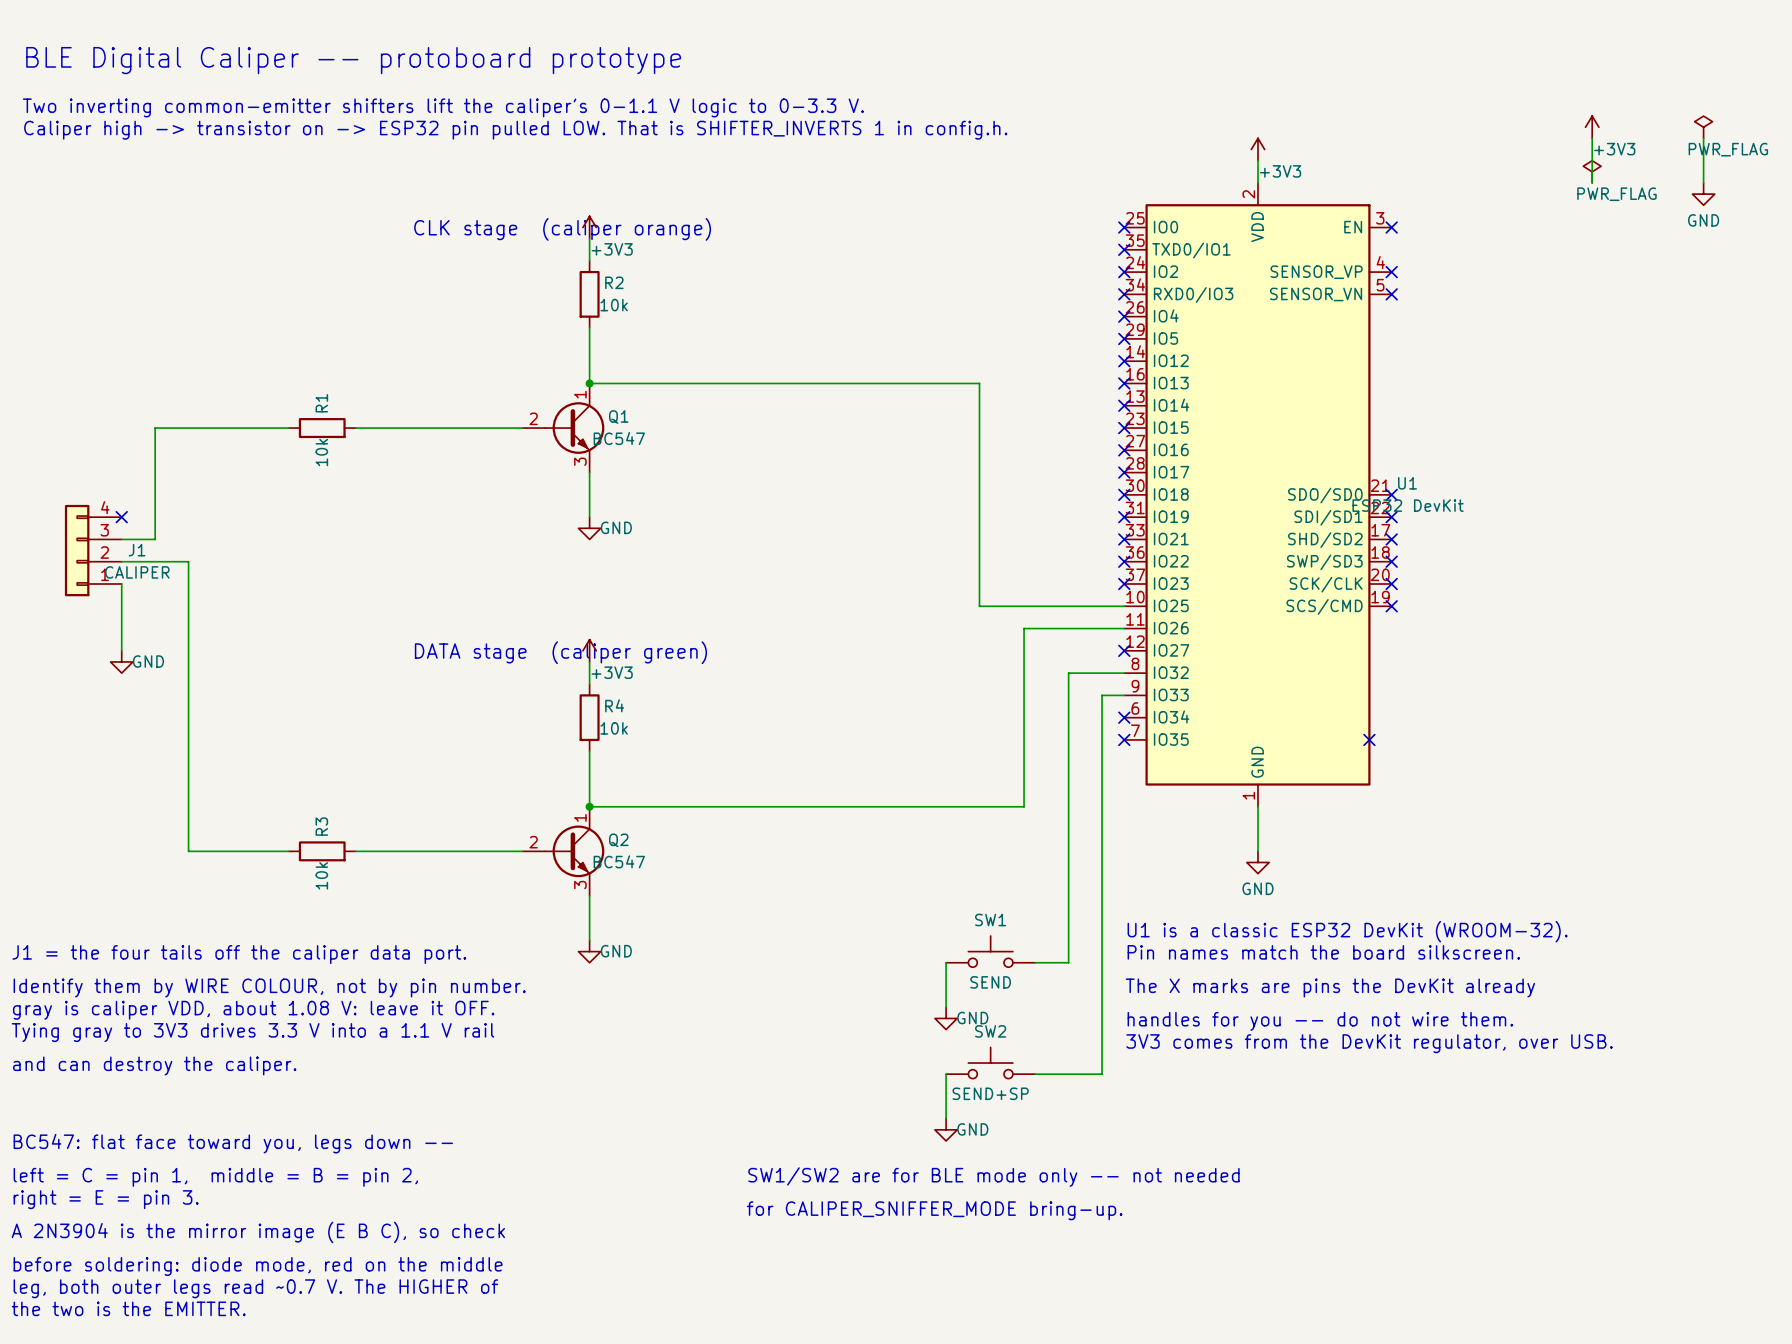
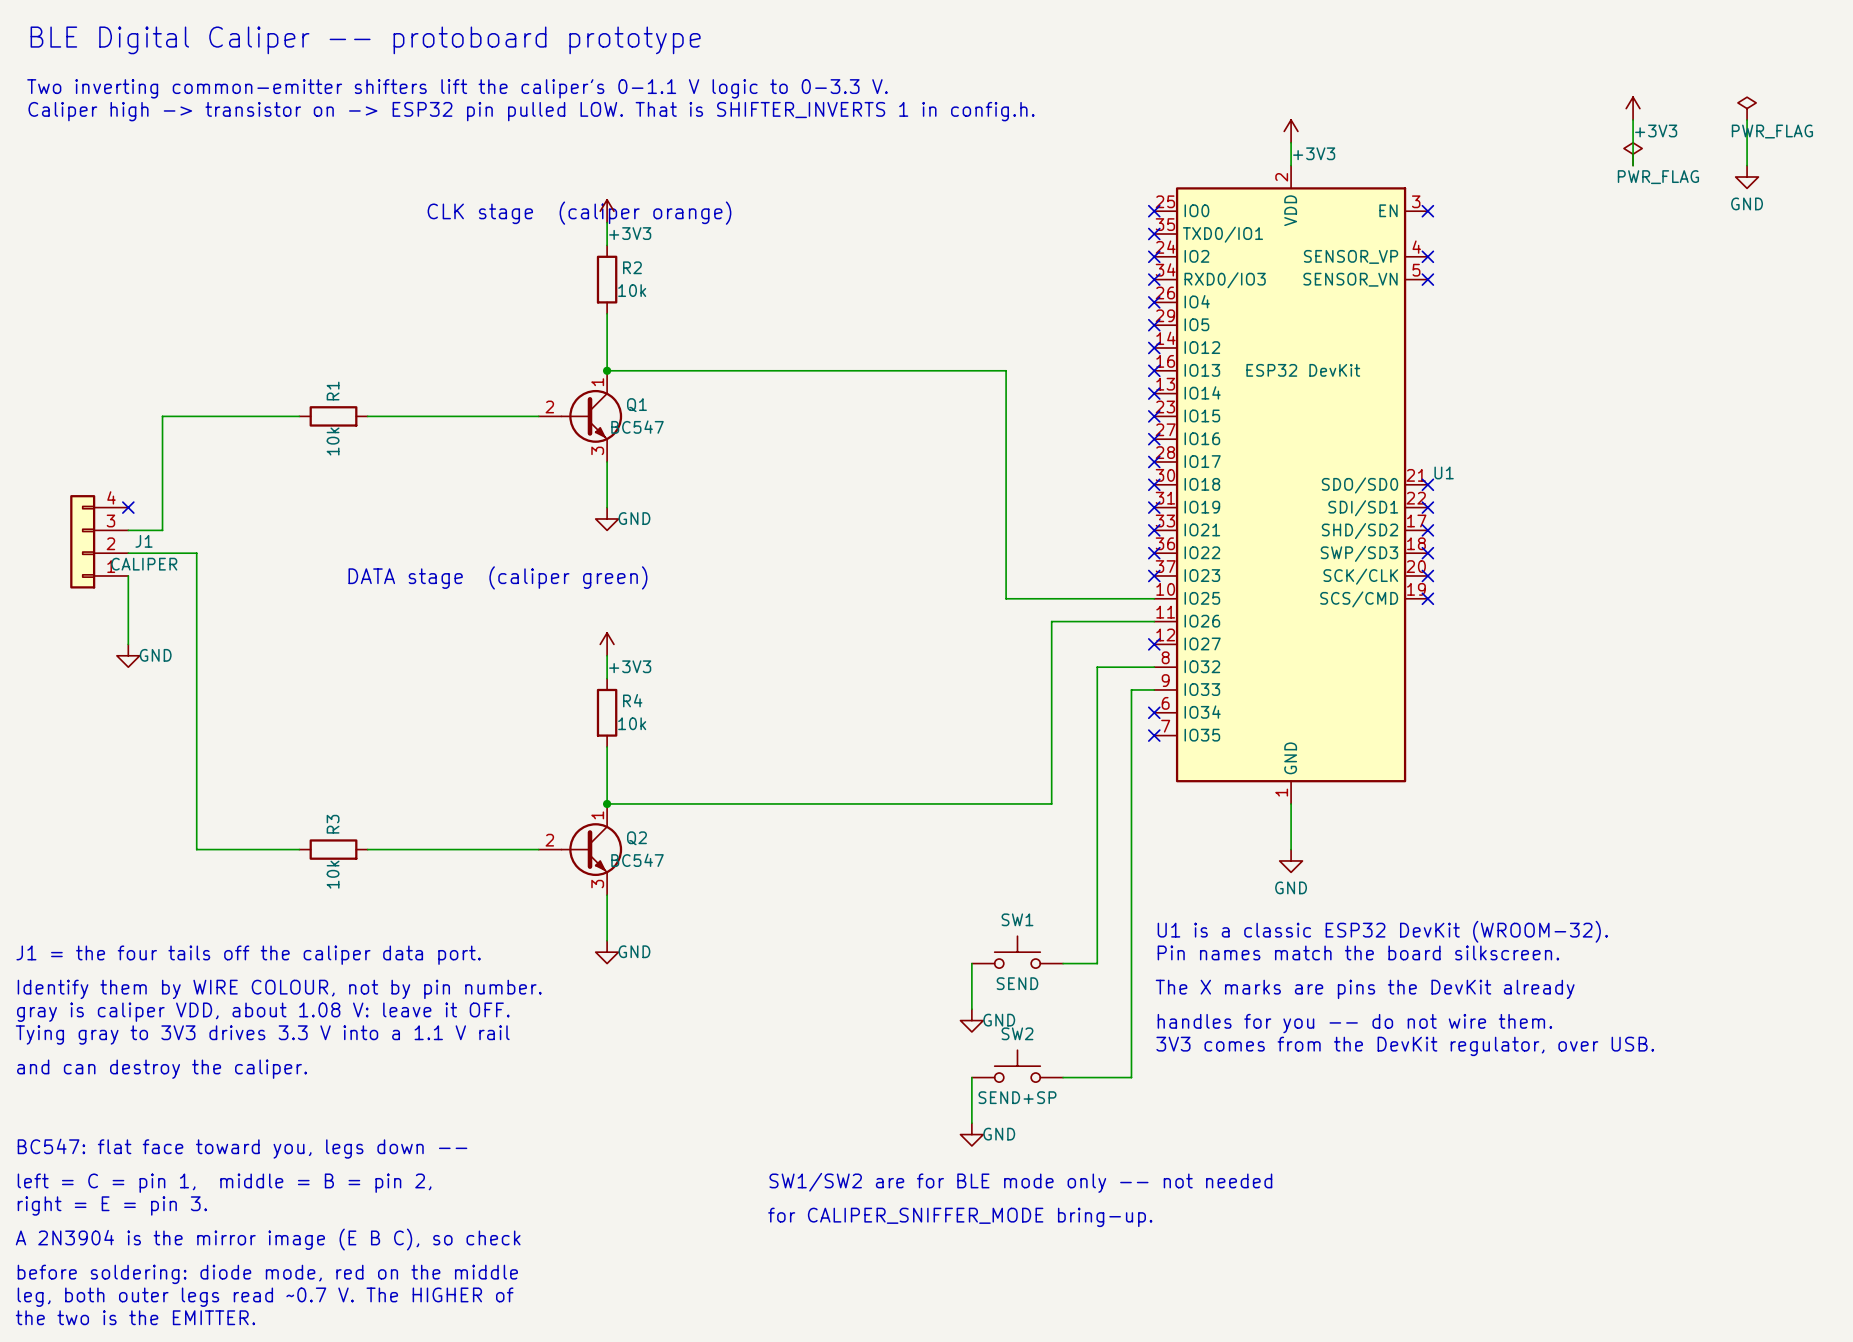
U1 value position: ESP32 DevKit (1408, 505) -> ESP32 DevKit (1303, 370)
text position: DATA stage (caliper green) (560, 652) -> DATA stage (caliper green) (497, 577)
no-connect mark: (1369, 739) -> none

